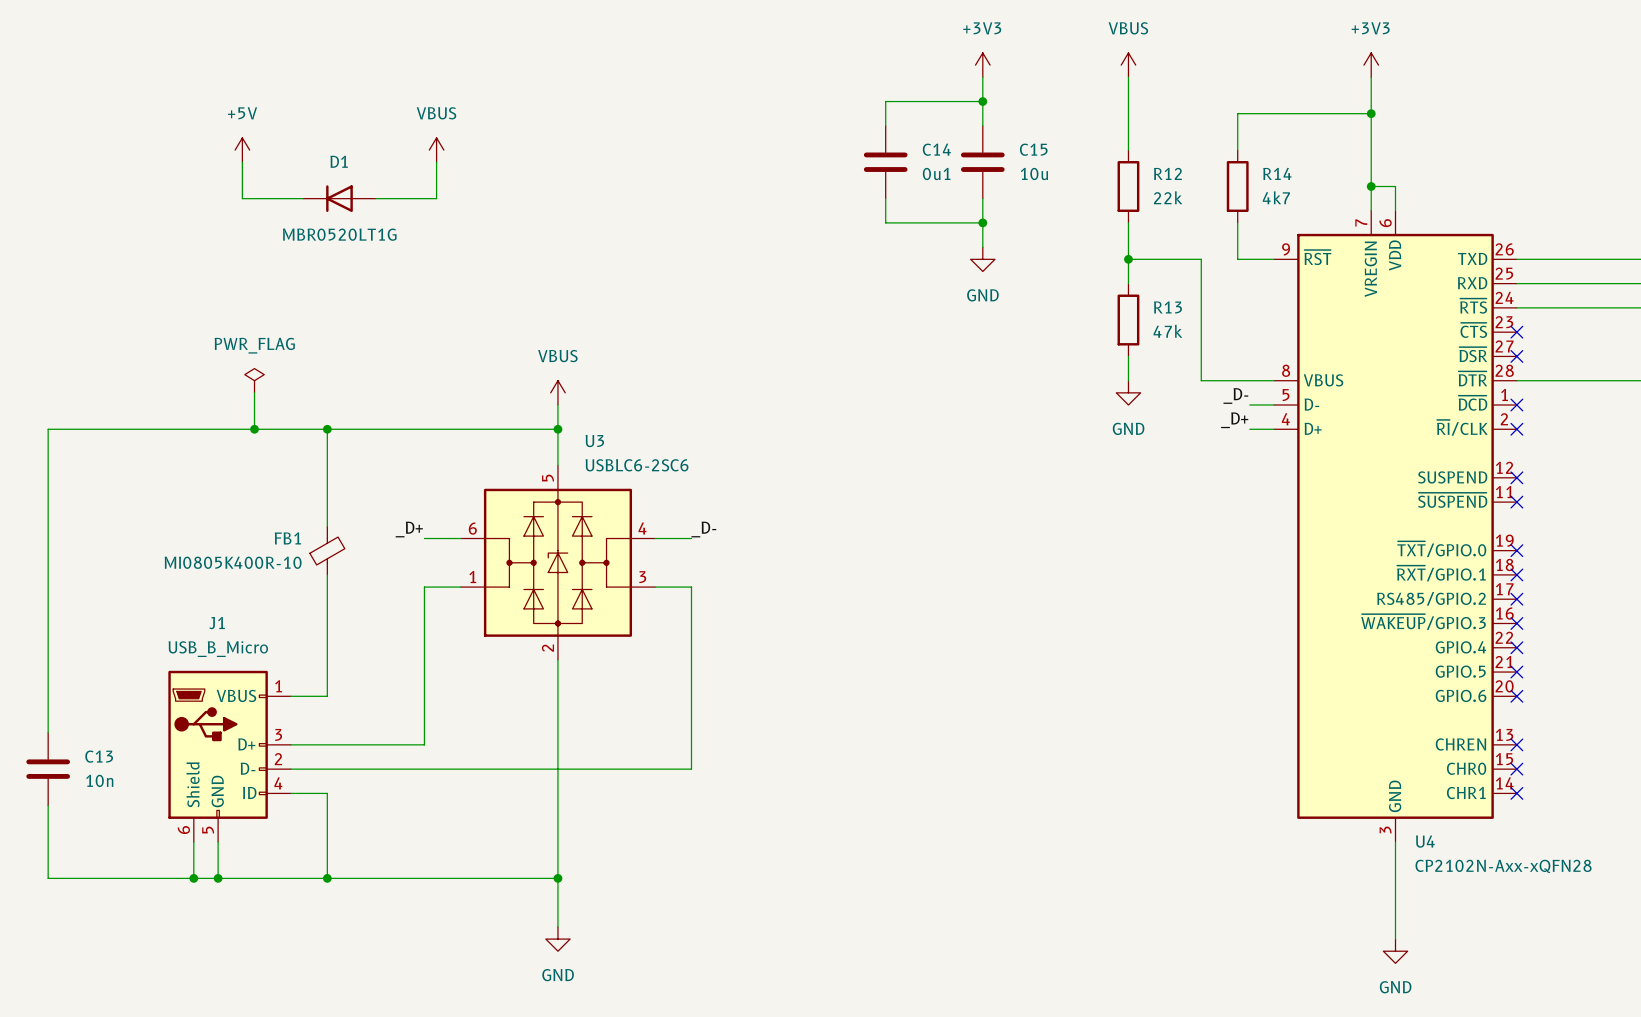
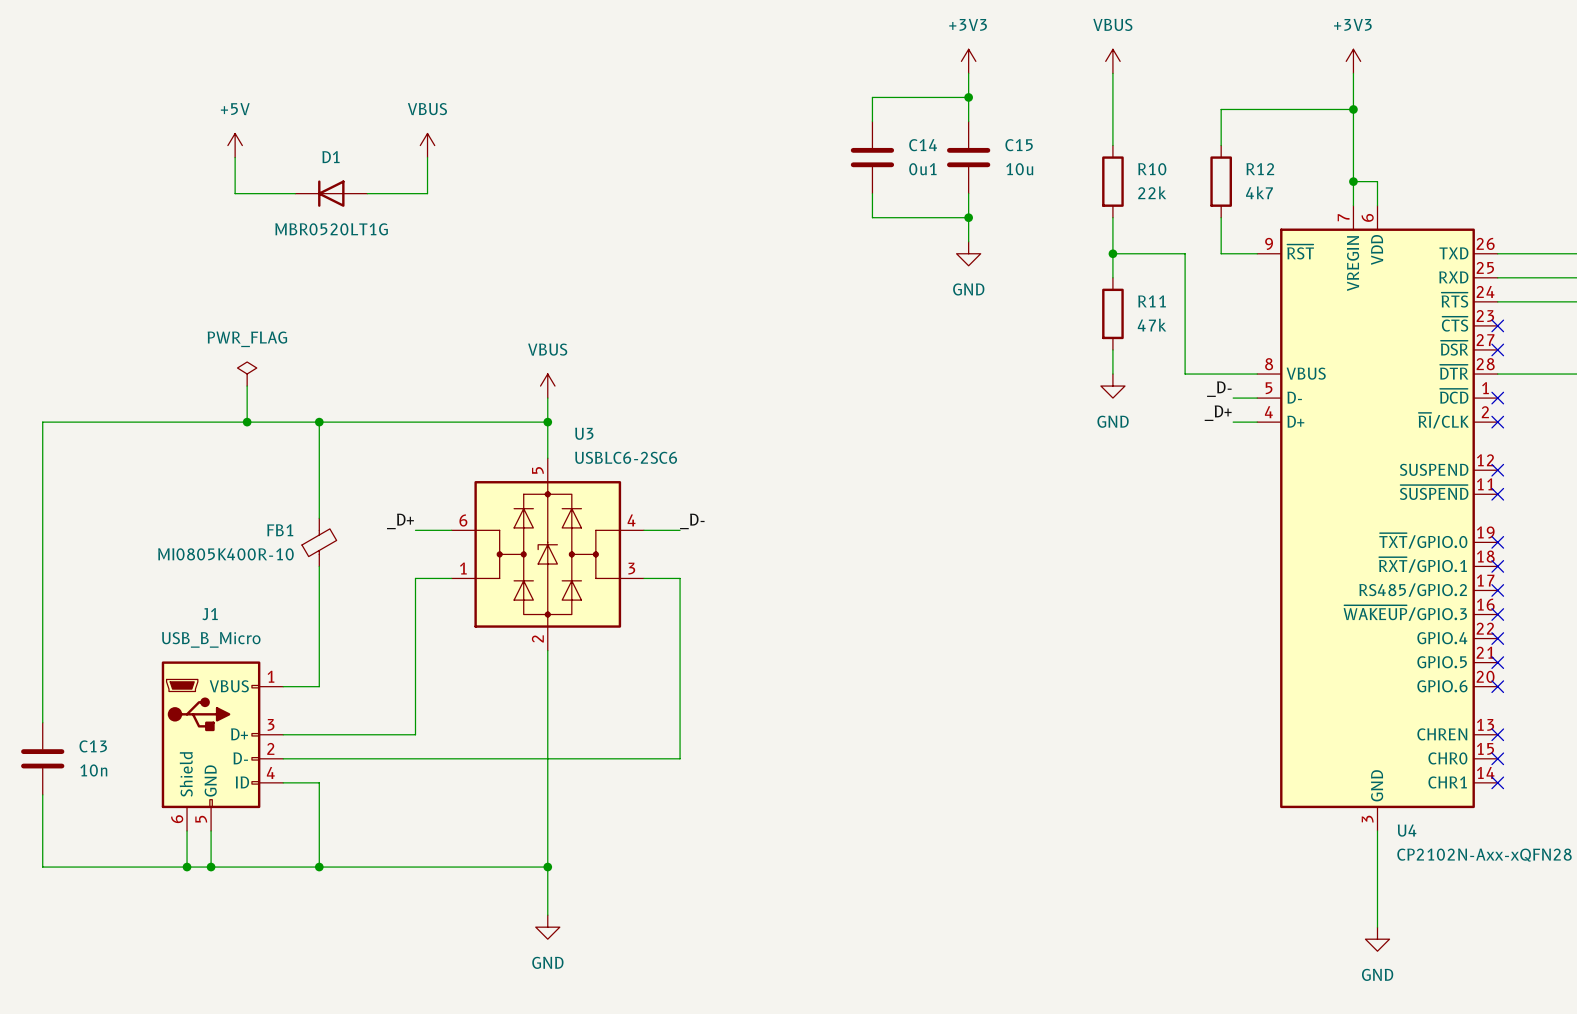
R12 name: R12 (1167, 173) -> R10 (1152, 169)
R14 name: R14 (1277, 173) -> R12 (1260, 169)
R13 name: R13 (1167, 307) -> R11 (1152, 301)

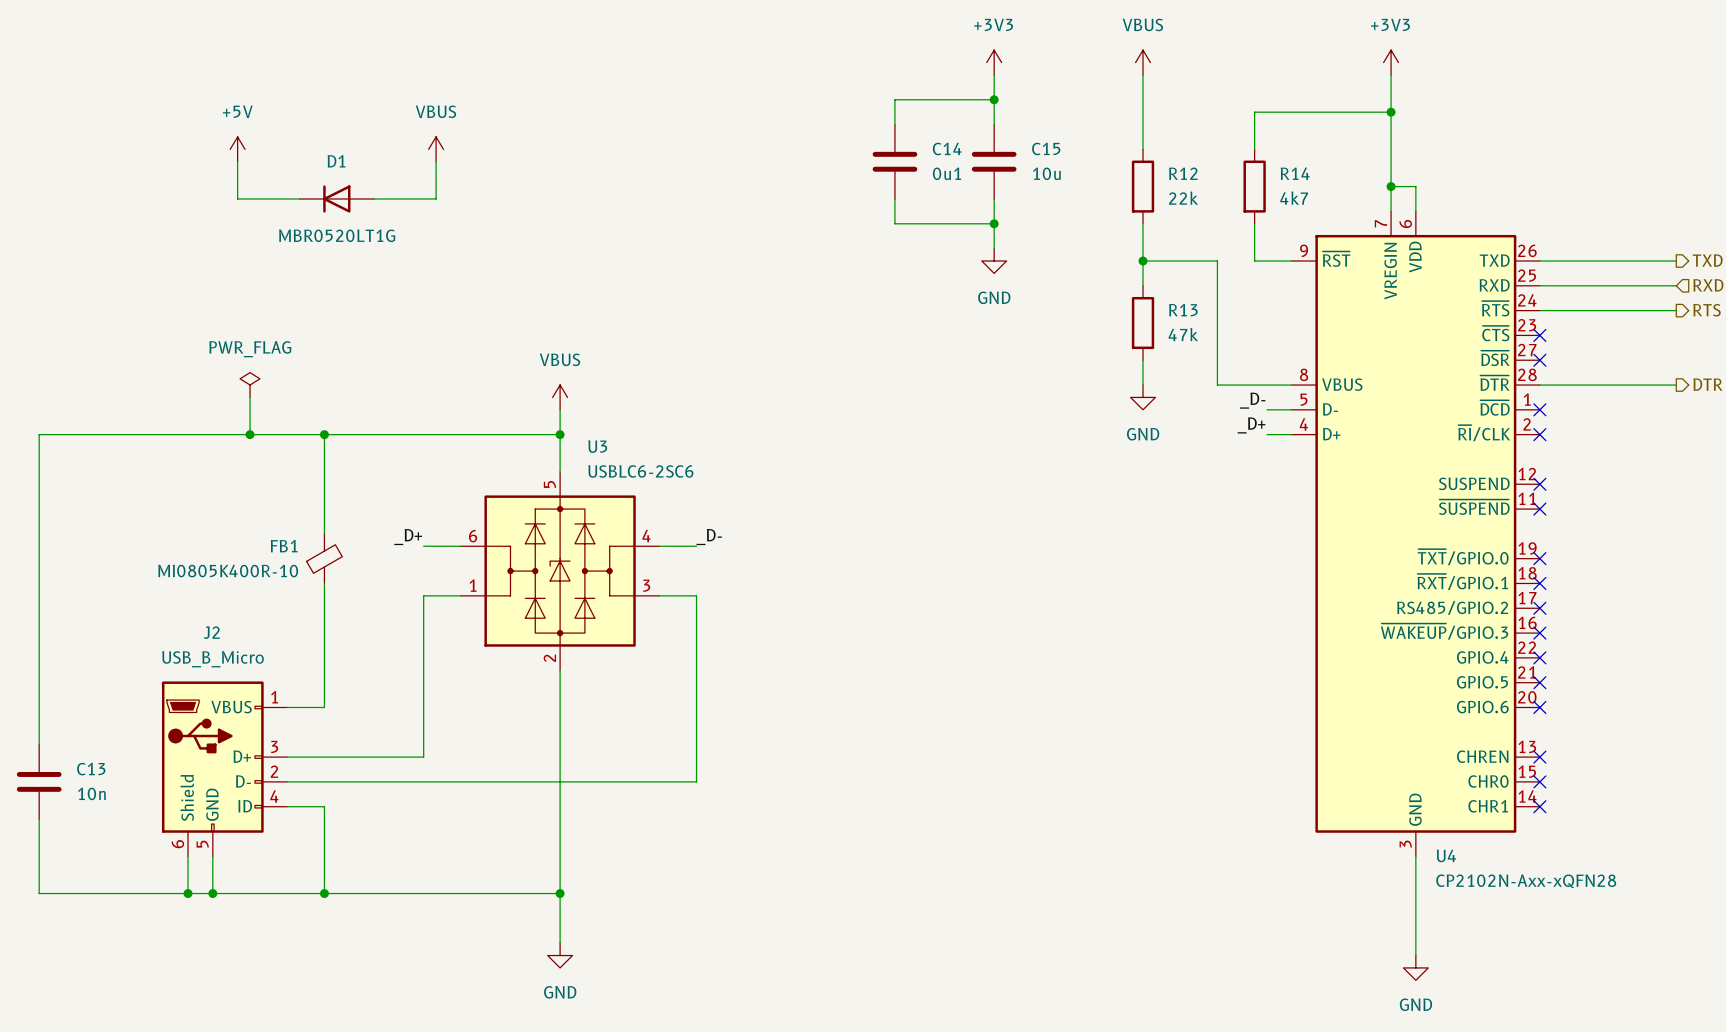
R10 name: R10 (1152, 169) -> R12 (1183, 173)
R12 name: R12 (1260, 169) -> R14 (1295, 173)
R11 name: R11 (1152, 301) -> R13 (1183, 310)
J1 name: J1 (210, 614) -> J2 (211, 632)

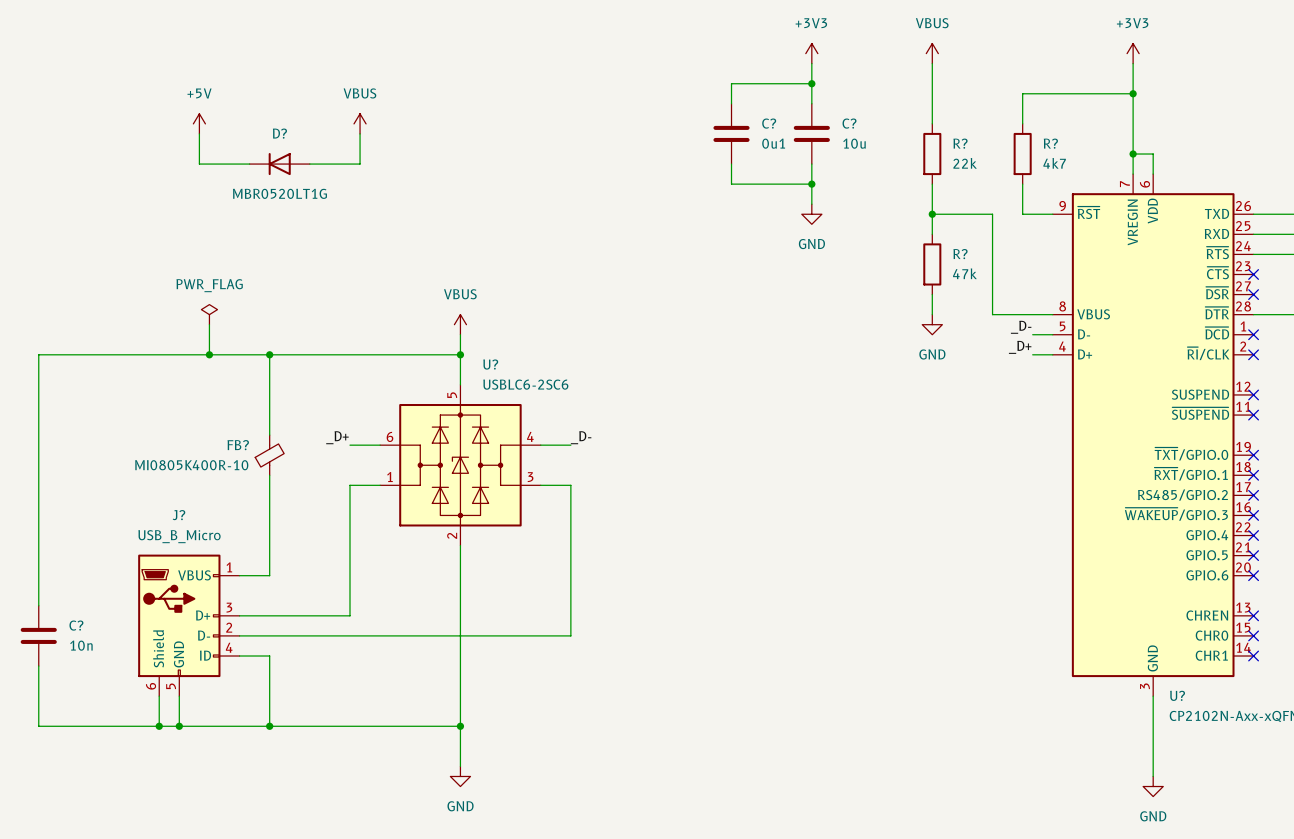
C14 name: C14 (947, 148) -> C? (769, 123)
C15 name: C15 (1046, 148) -> C? (849, 123)
D1 name: D1 (336, 161) -> D? (279, 133)
R12 name: R12 (1183, 173) -> R? (960, 143)
R14 name: R14 (1295, 173) -> R? (1050, 143)
R13 name: R13 (1183, 310) -> R? (960, 254)
U3 name: U3 (597, 446) -> U? (490, 364)
FB1 name: FB1 (284, 546) -> FB? (238, 445)
J2 name: J2 (211, 632) -> J? (178, 515)
C13 name: C13 (91, 769) -> C? (76, 625)
U4 name: U4 (1446, 855) -> U? (1177, 695)

